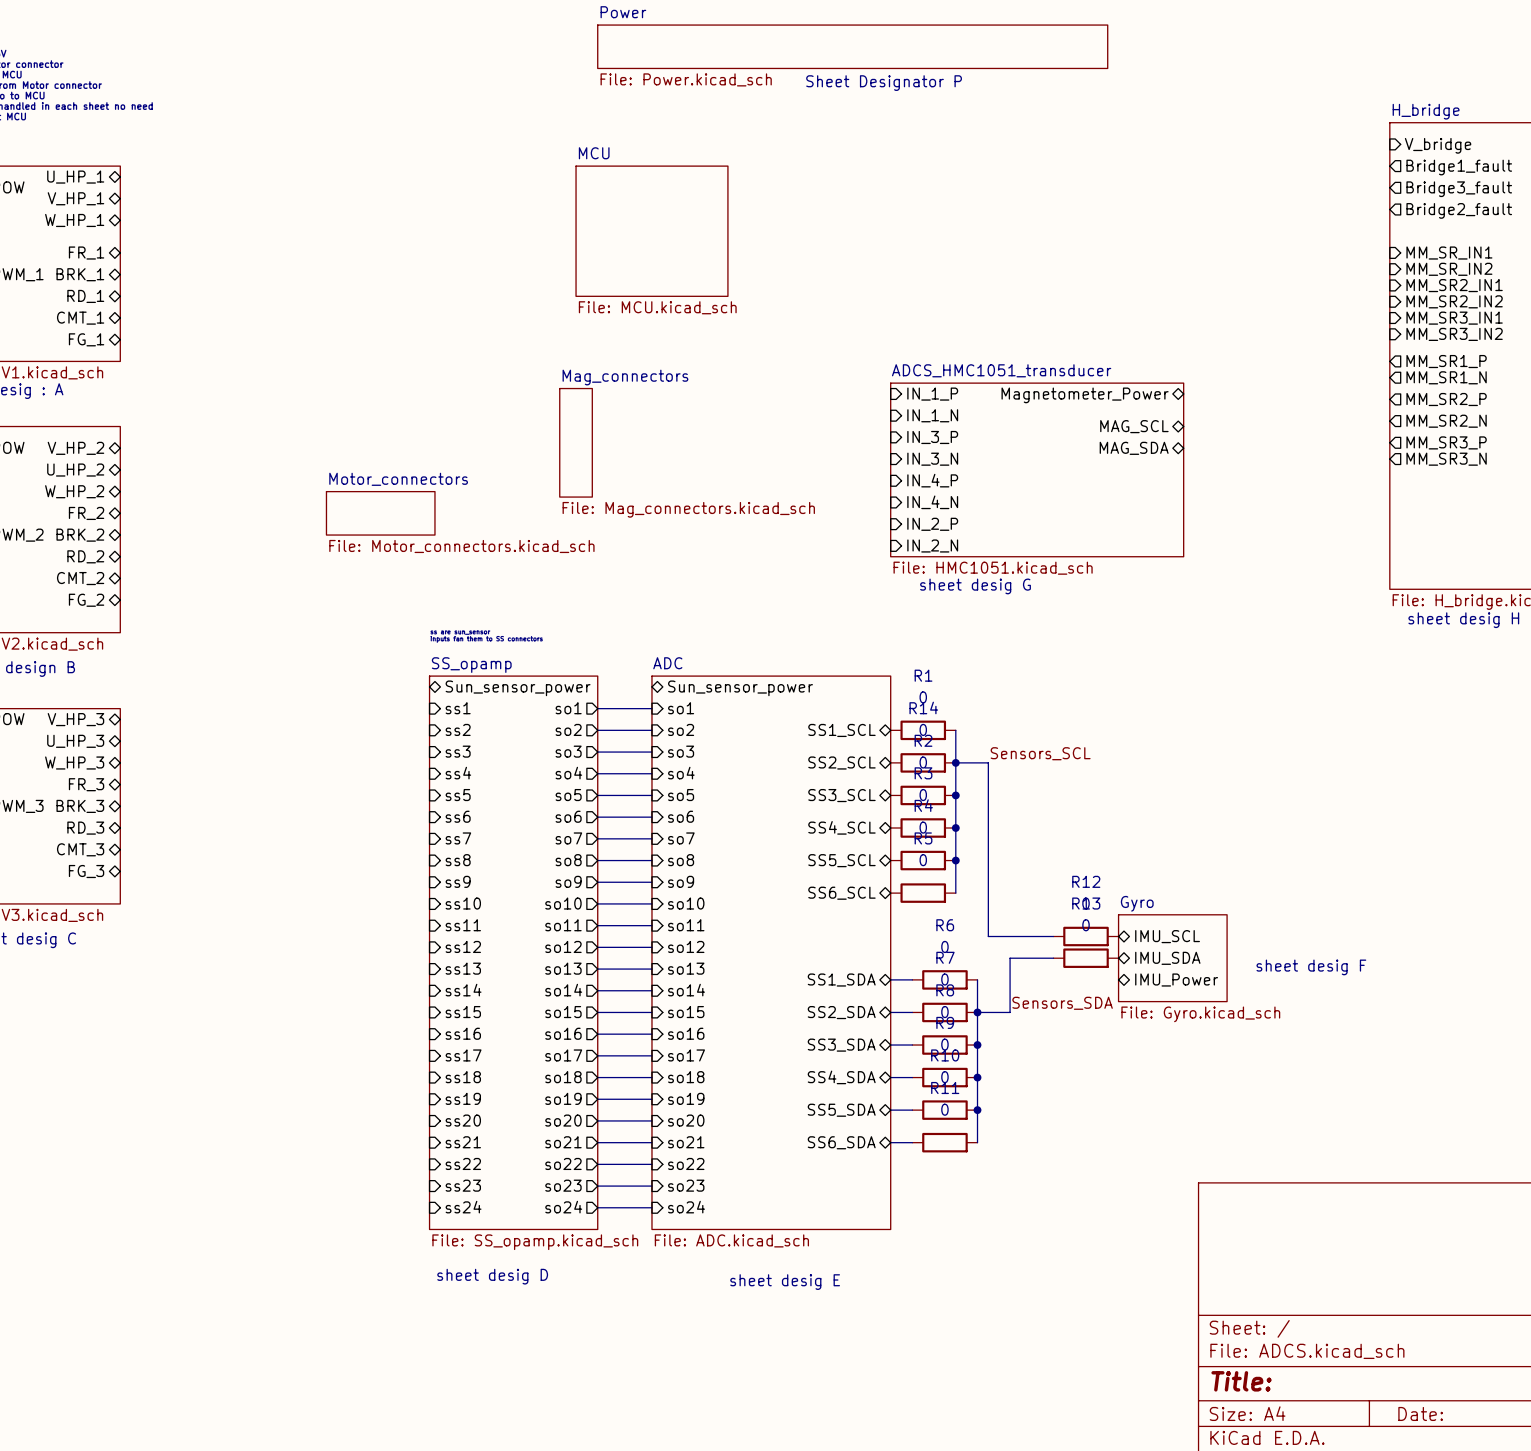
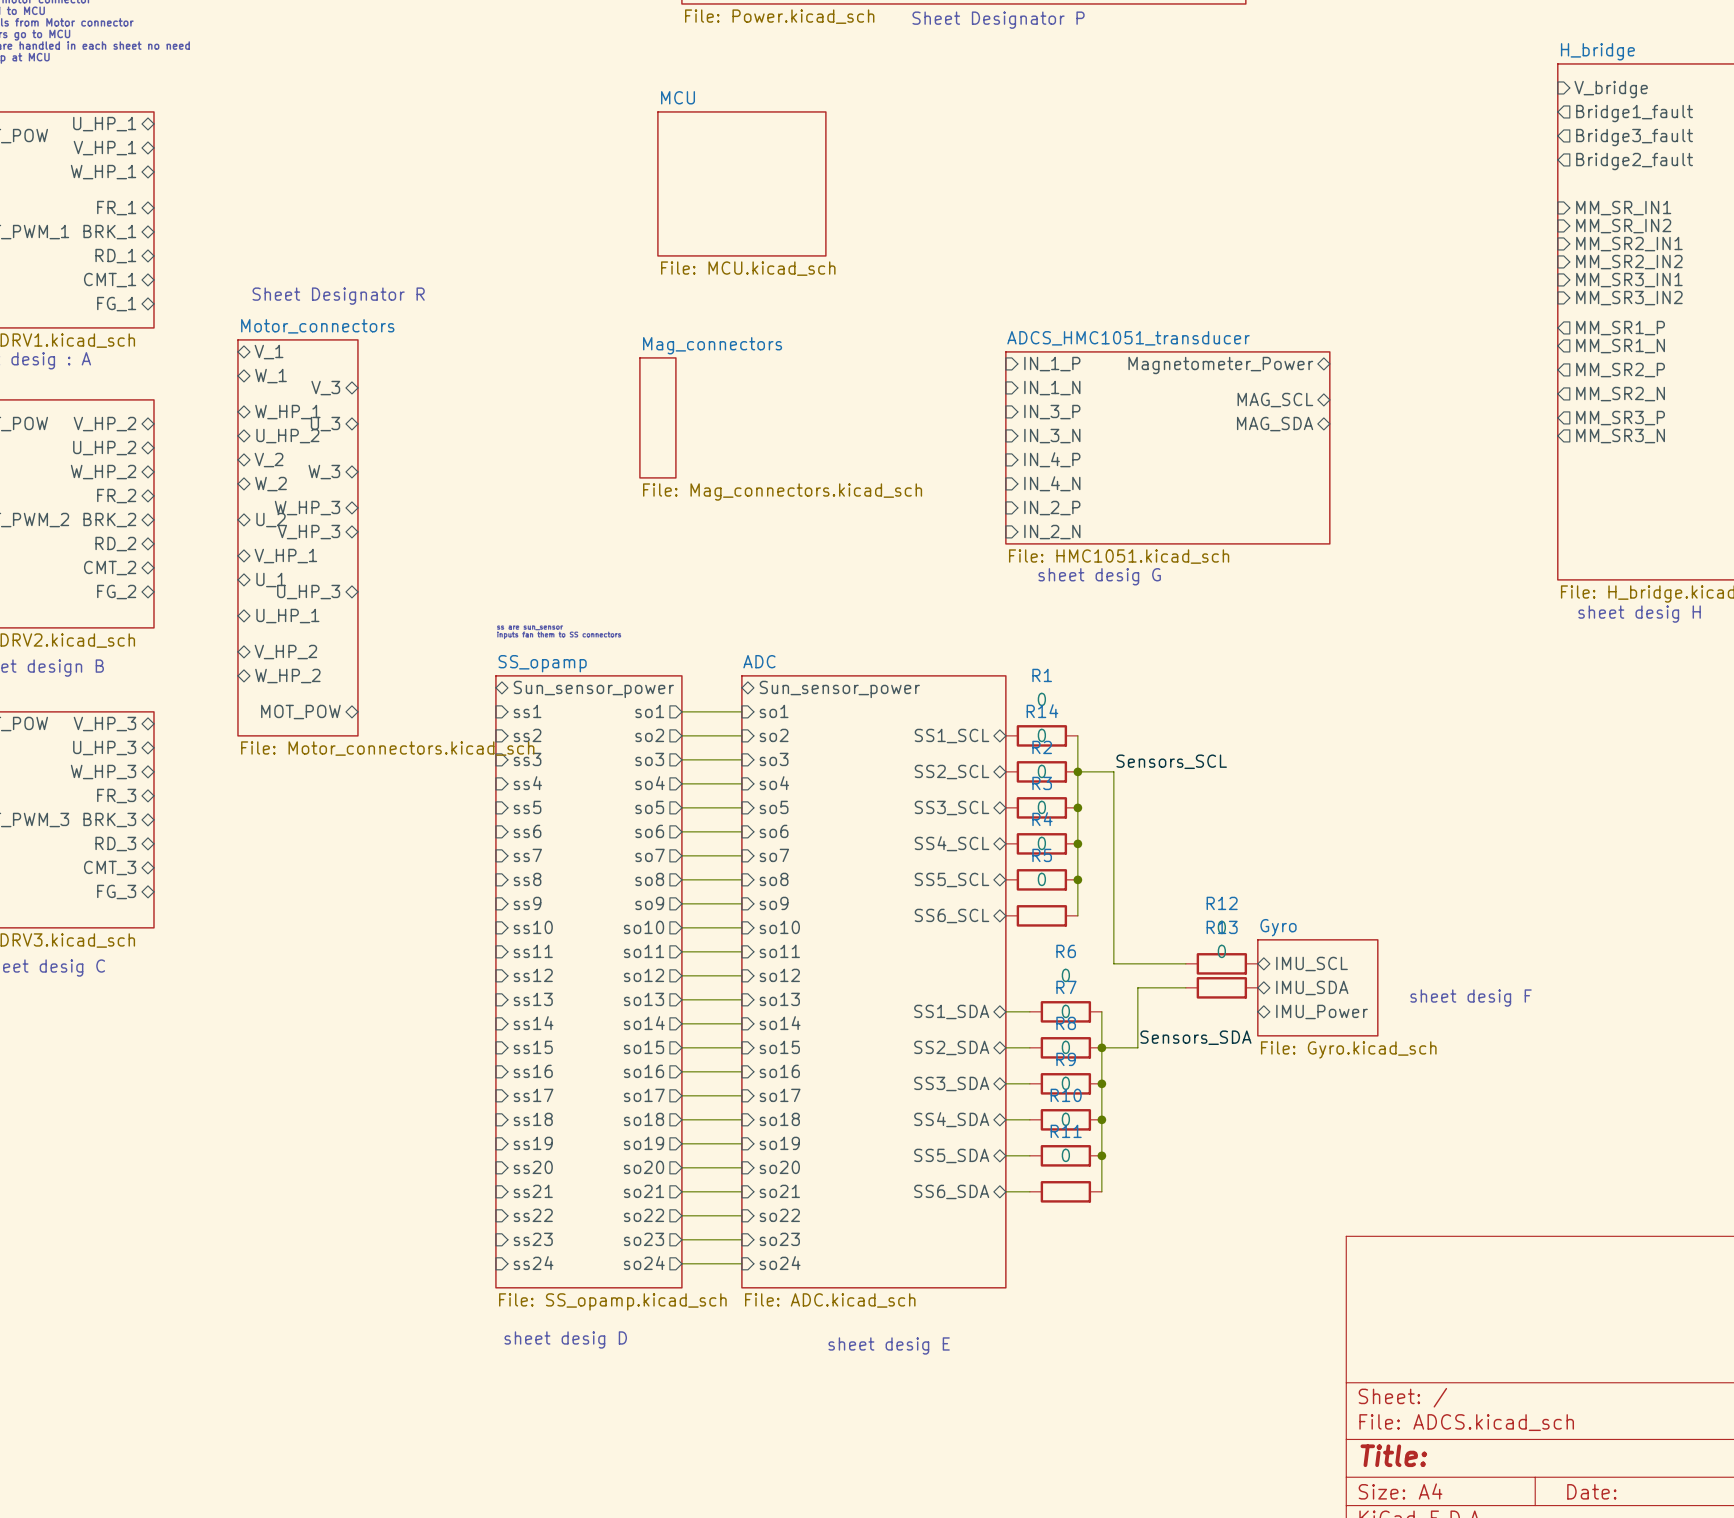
text: none -> Sheet Designator R (338, 296)
sheet pin: none -> V_1 (269, 352)
sheet pin: none -> W_1 (271, 376)
sheet pin: none -> V_3 (325, 388)
sheet pin: none -> W_HP_1 (287, 412)
sheet pin: none -> U_3 (325, 424)
sheet pin: none -> U_HP_2 (287, 436)
sheet pin: none -> V_2 (269, 460)
sheet pin: none -> W_3 (324, 472)
sheet pin: none -> W_2 (271, 484)
sheet Motor_connectors: File: Motor_connectors.kicad_sch (380, 513) -> none
sheet pin: none -> W_HP_3 (307, 508)
sheet pin: none -> U_2 (271, 520)
sheet pin: none -> V_HP_3 (308, 532)
sheet Motor_connectors: none -> File: Motor_connectors.kicad_sch (297, 537)
sheet pin: none -> V_HP_1 (285, 556)
sheet pin: none -> U_1 (271, 580)
sheet pin: none -> U_HP_3 (308, 592)
sheet pin: none -> U_HP_1 (287, 616)
sheet pin: none -> V_HP_2 (285, 652)
sheet pin: none -> W_HP_2 (287, 676)
sheet pin: none -> MOT_POW (300, 712)

